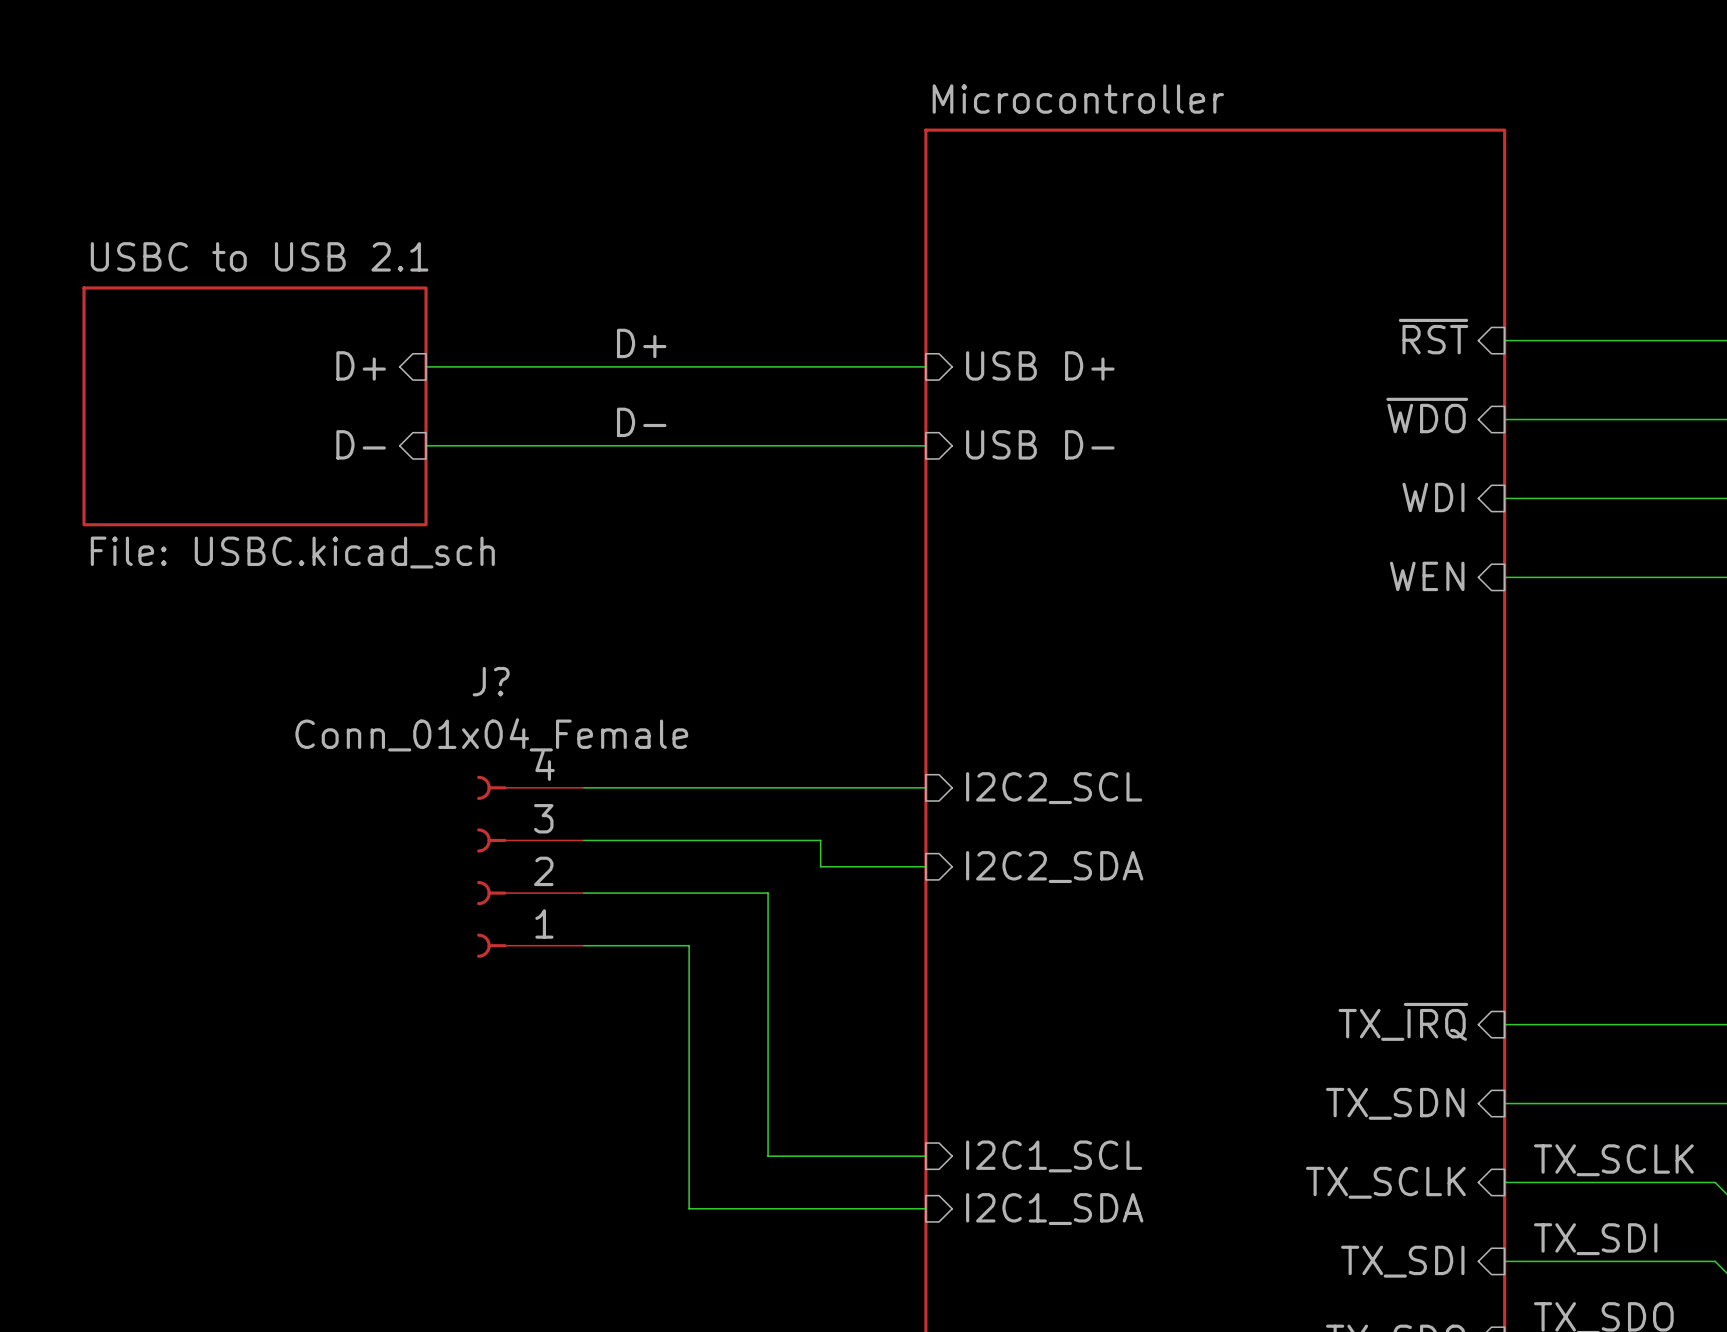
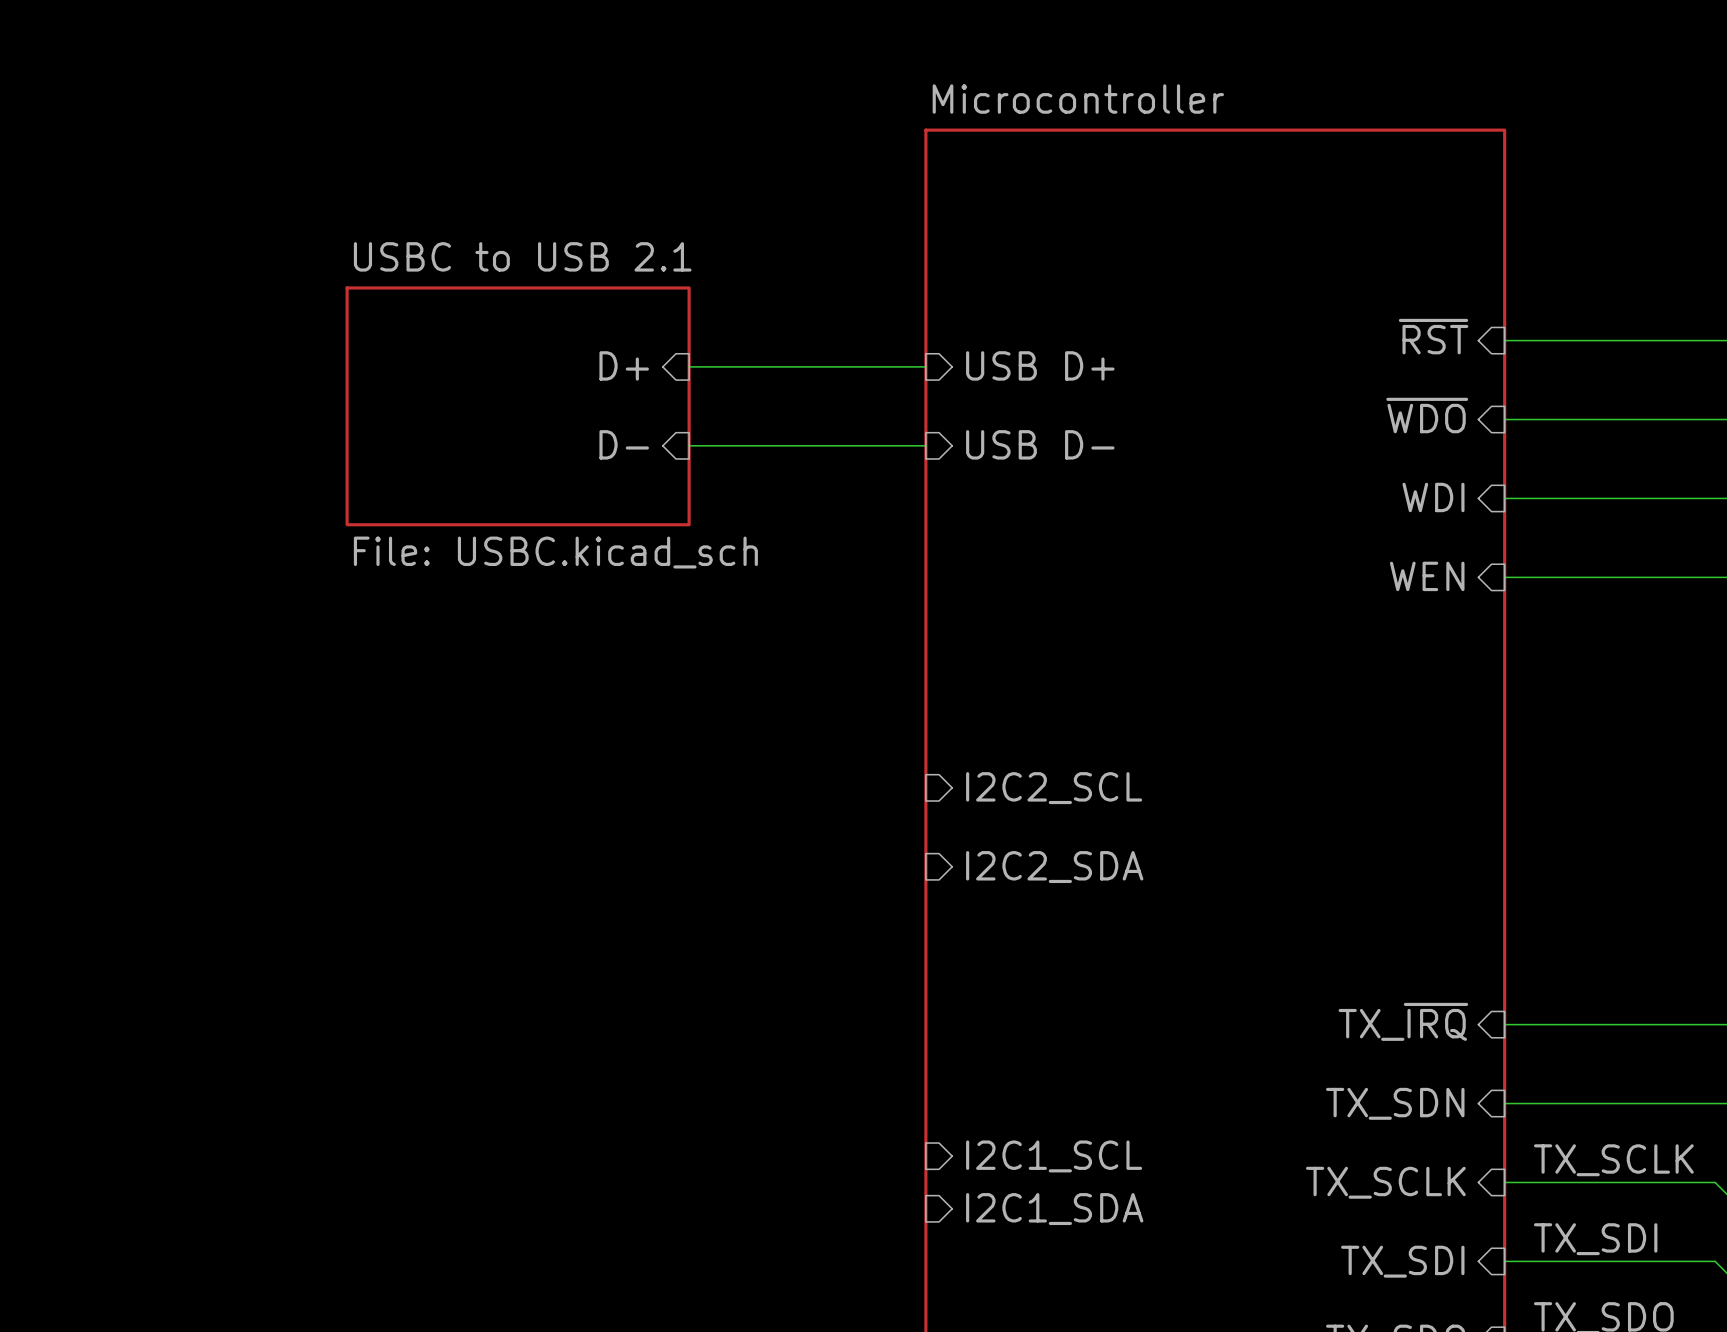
label: D+ (641, 343) -> none
sheet pin position: D+ (361, 365) -> D+ (624, 365)
wire: (426, 366) (689, 366) -> none
sheet USBC to USB 2.1 position: (255, 406) -> (518, 406)
label: D- (641, 422) -> none
sheet pin position: D- (361, 444) -> D- (624, 444)
wire: (426, 445) (689, 445) -> none
wire: (583, 787) (925, 787) -> none
wire: (583, 840) (820, 840) (820, 866) (925, 866) -> none
J?: Conn_01x04_Female (530, 866) -> none
wire: (583, 893) (768, 893) (768, 1156) (925, 1156) -> none
wire: (583, 945) (689, 945) (689, 1208) (925, 1208) -> none

